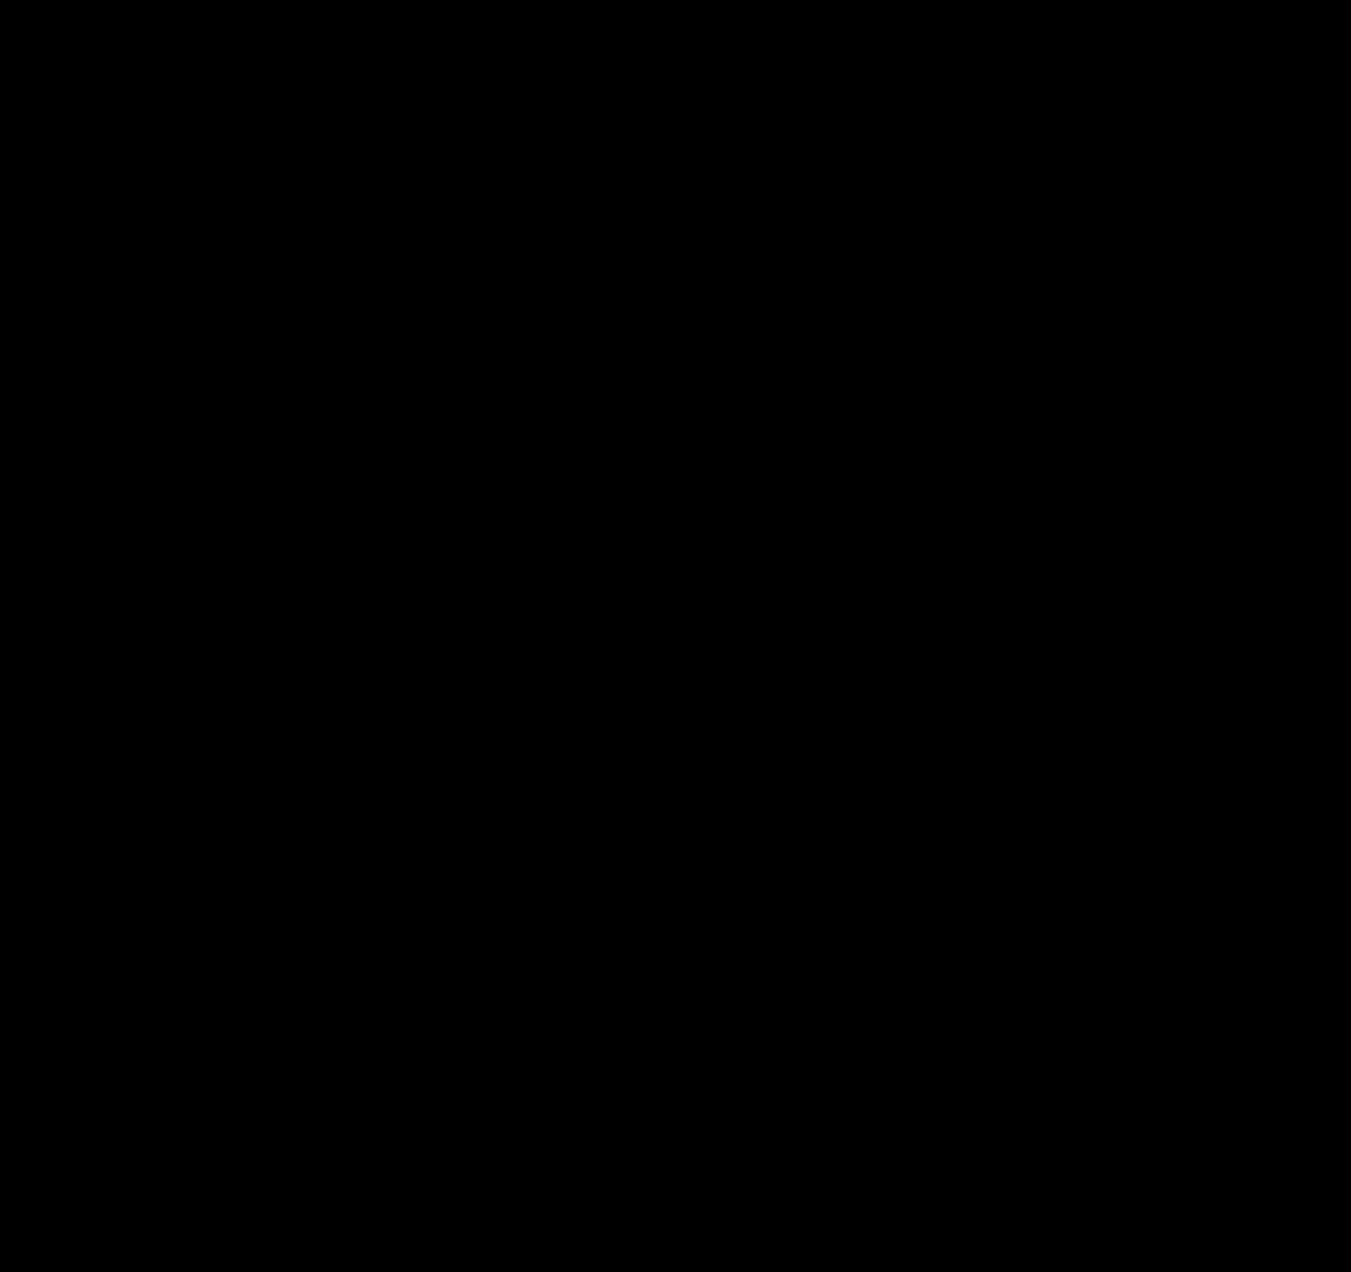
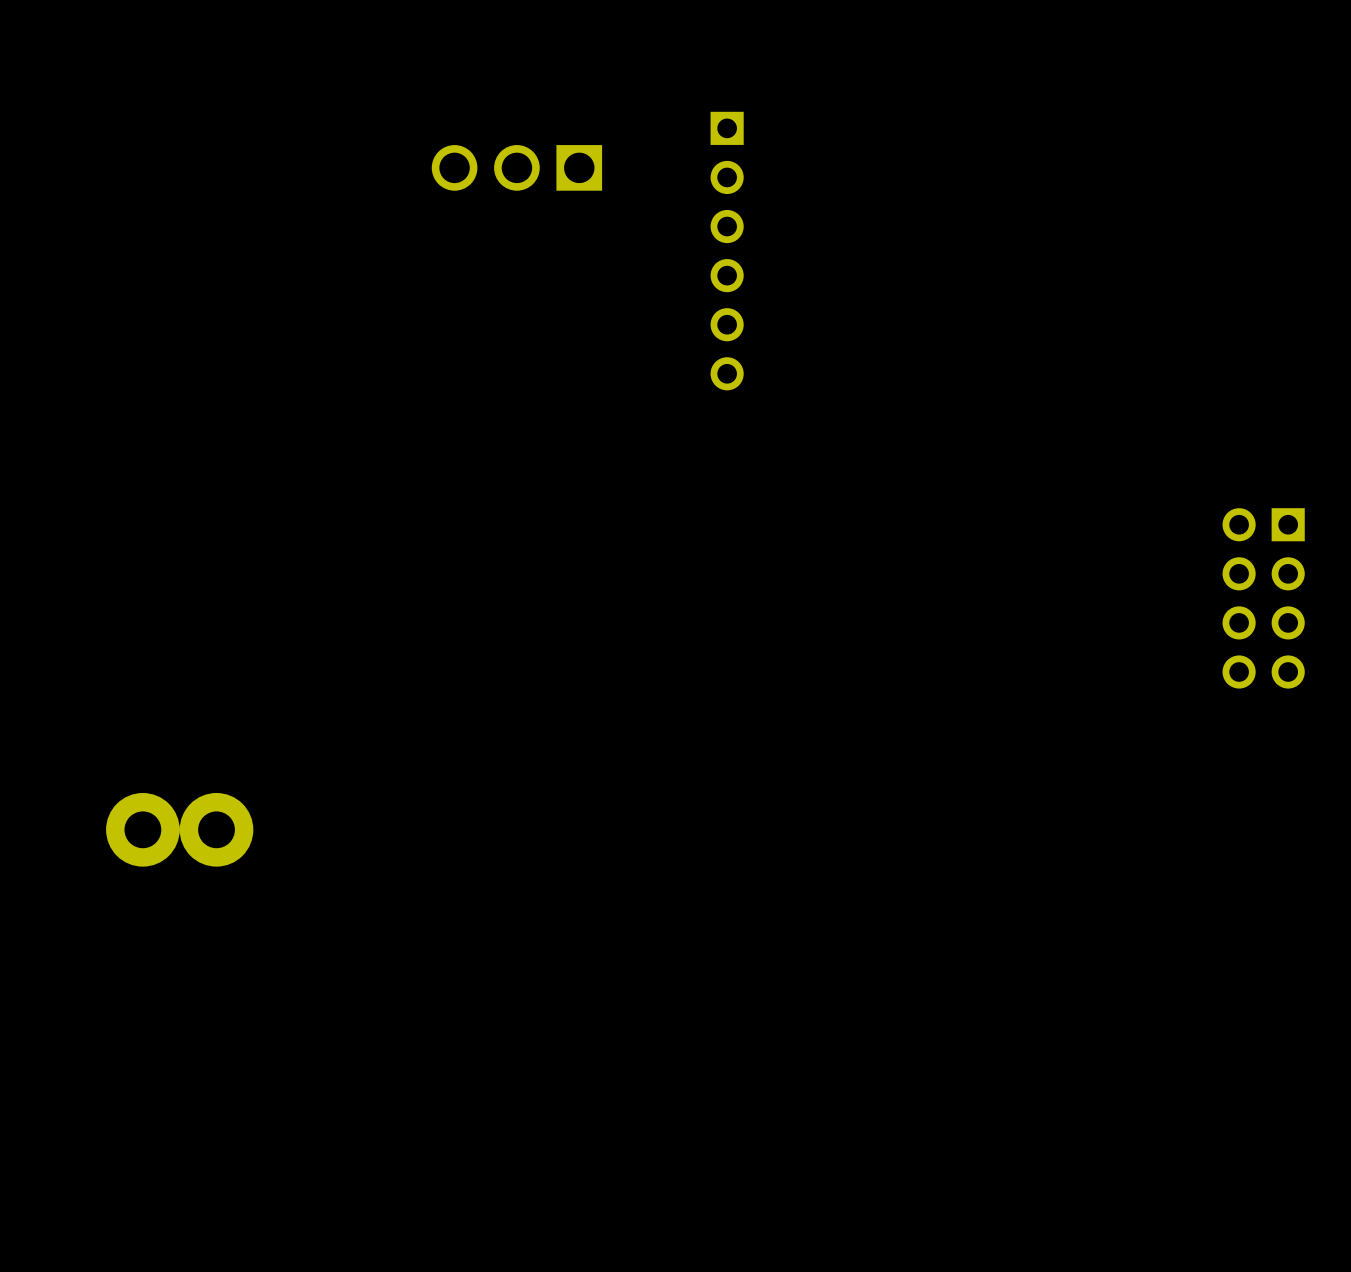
part: none -> (516, 167)
part: none -> (727, 251)
part: none -> (1263, 598)
part: none -> (179, 829)

